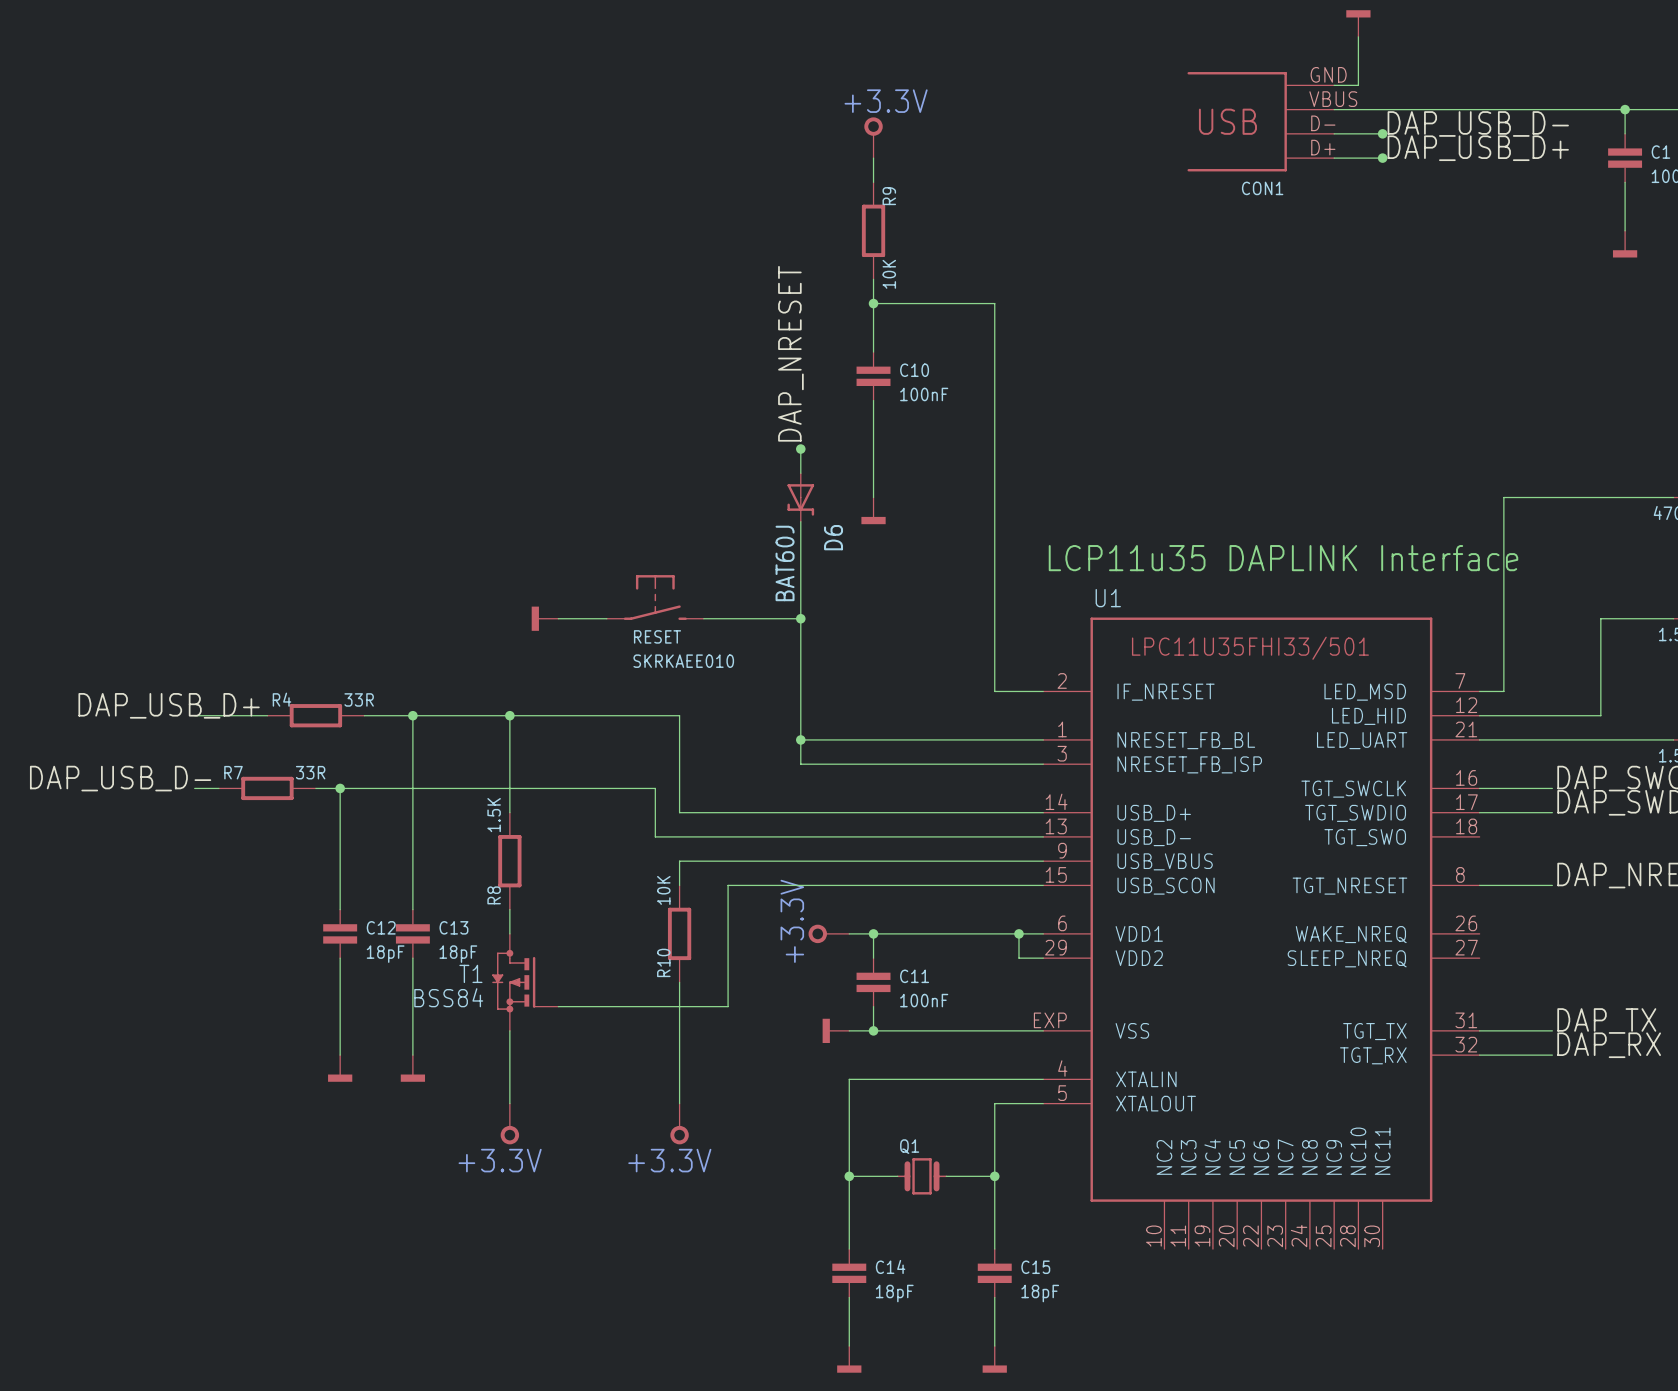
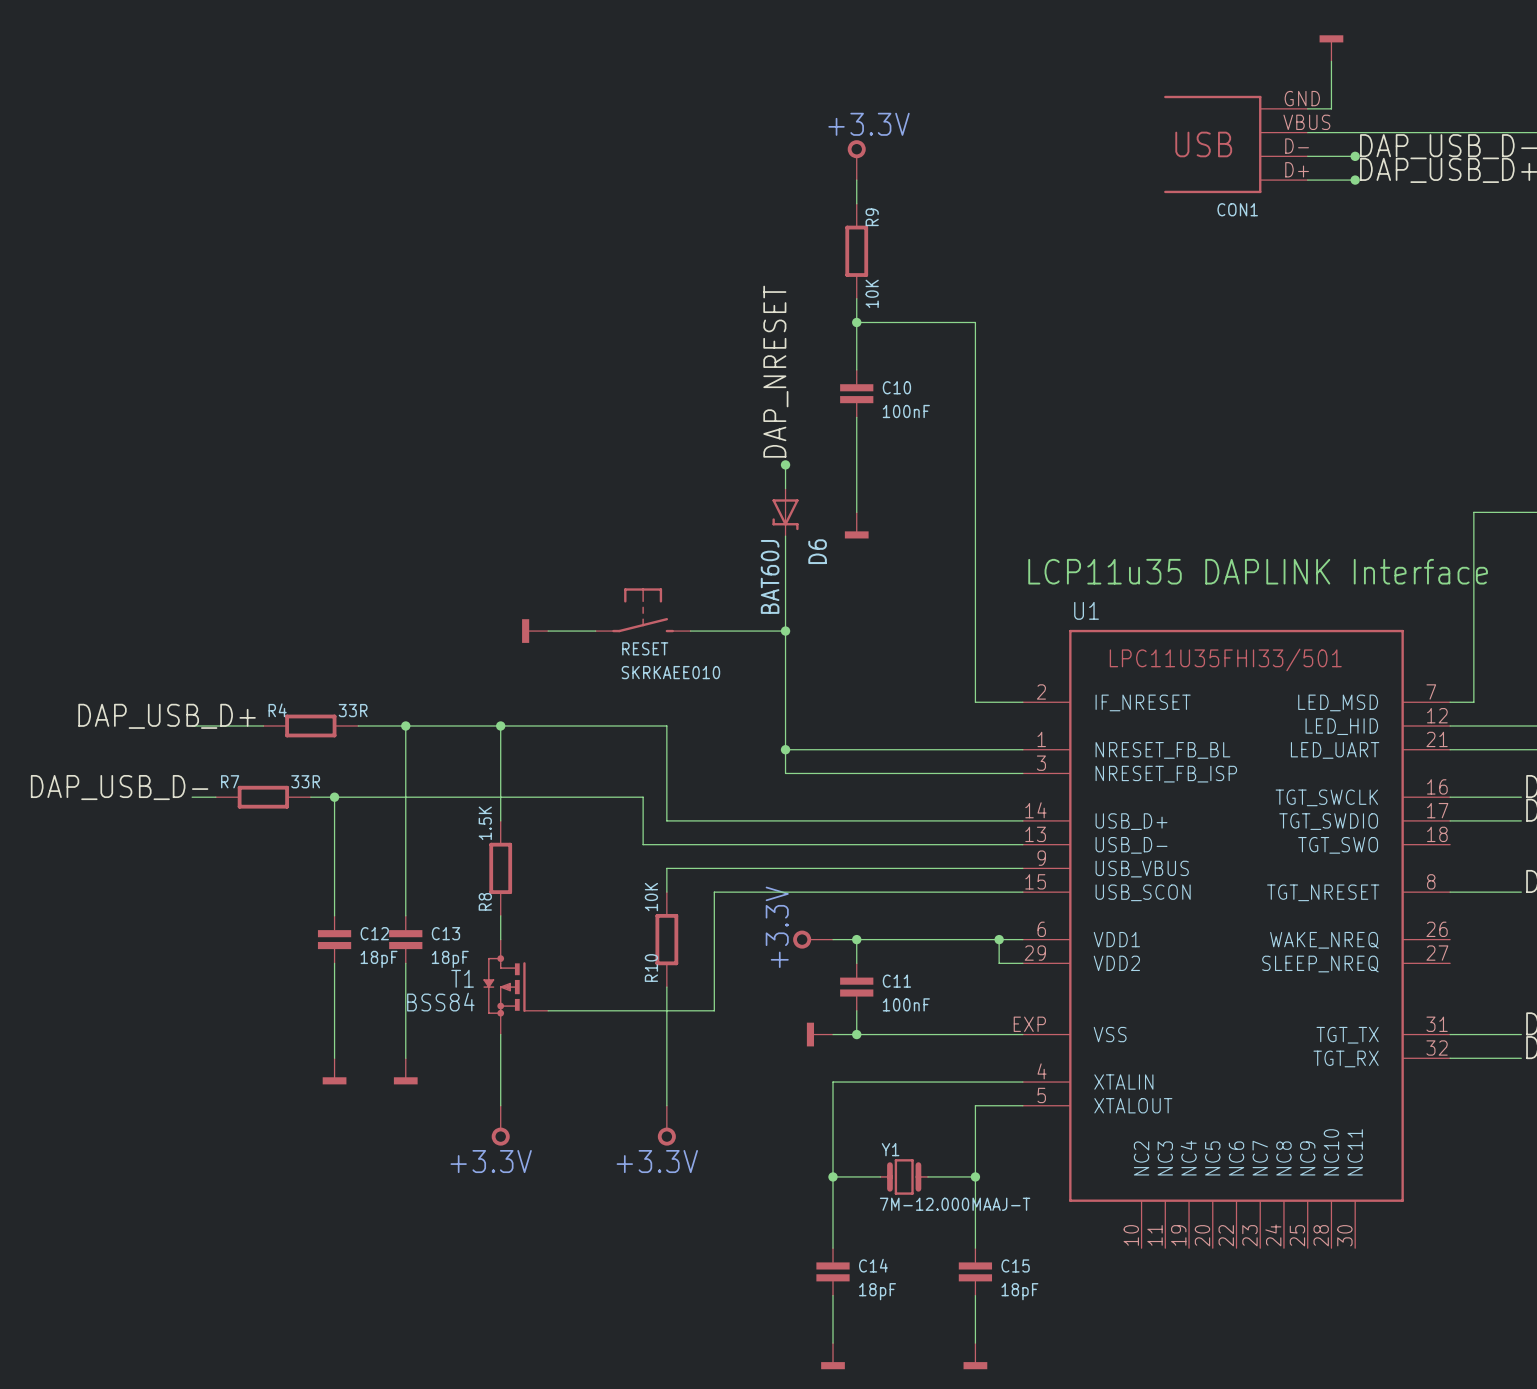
Q1 name: Q1 (909, 1146) -> Y1 (890, 1149)
Q1 value: none -> 7M-12.000MAAJ-T (955, 1204)

